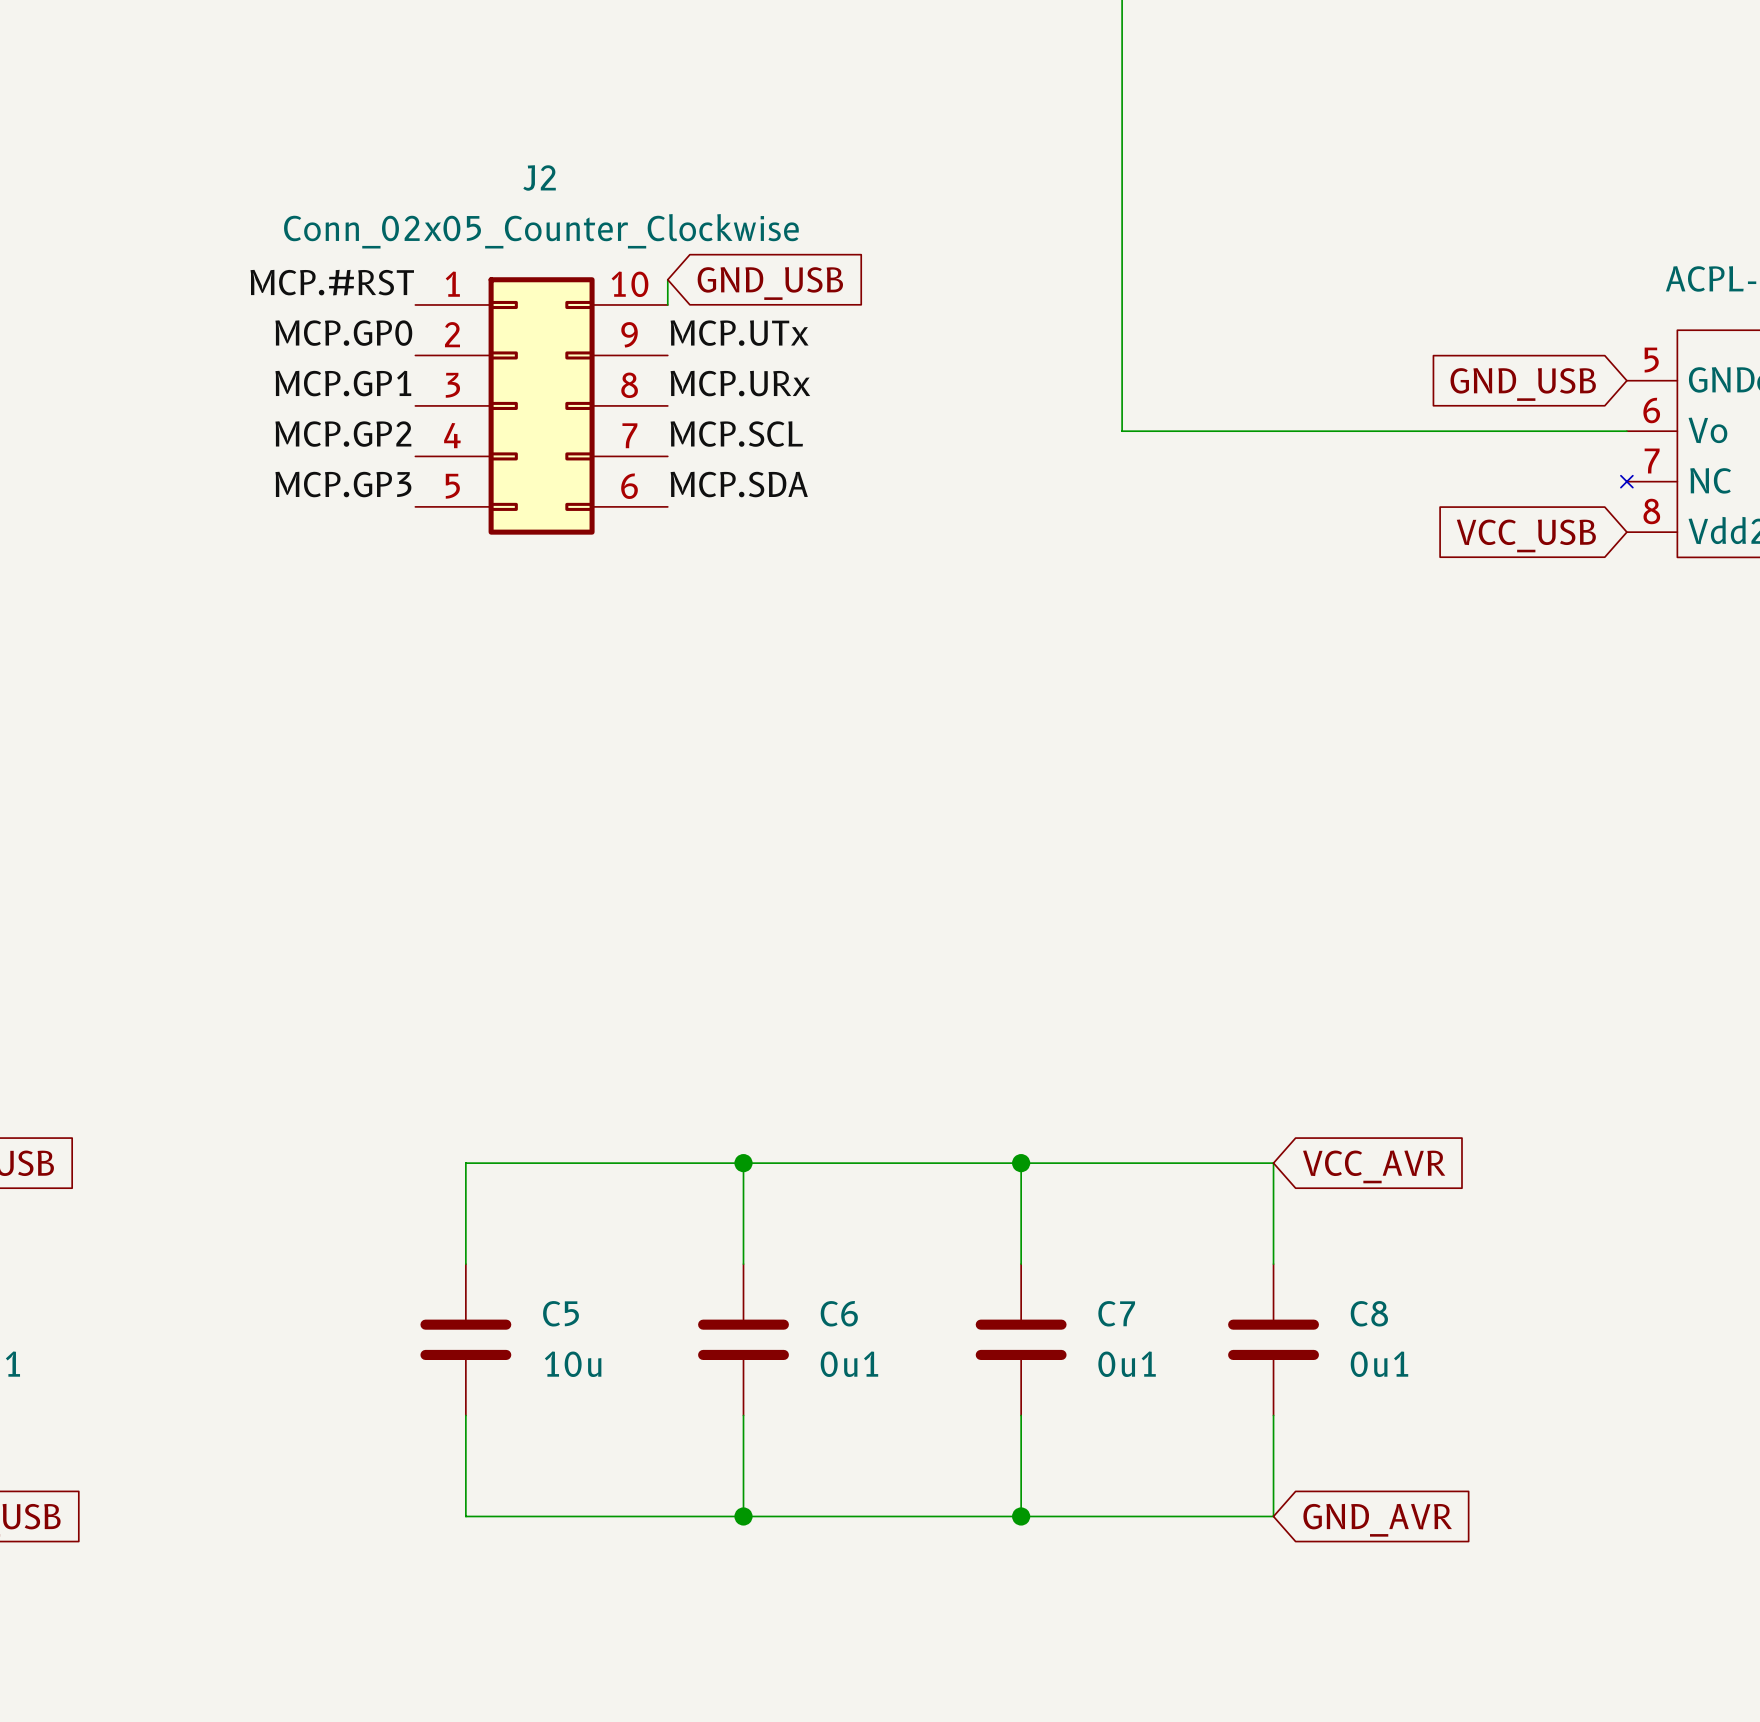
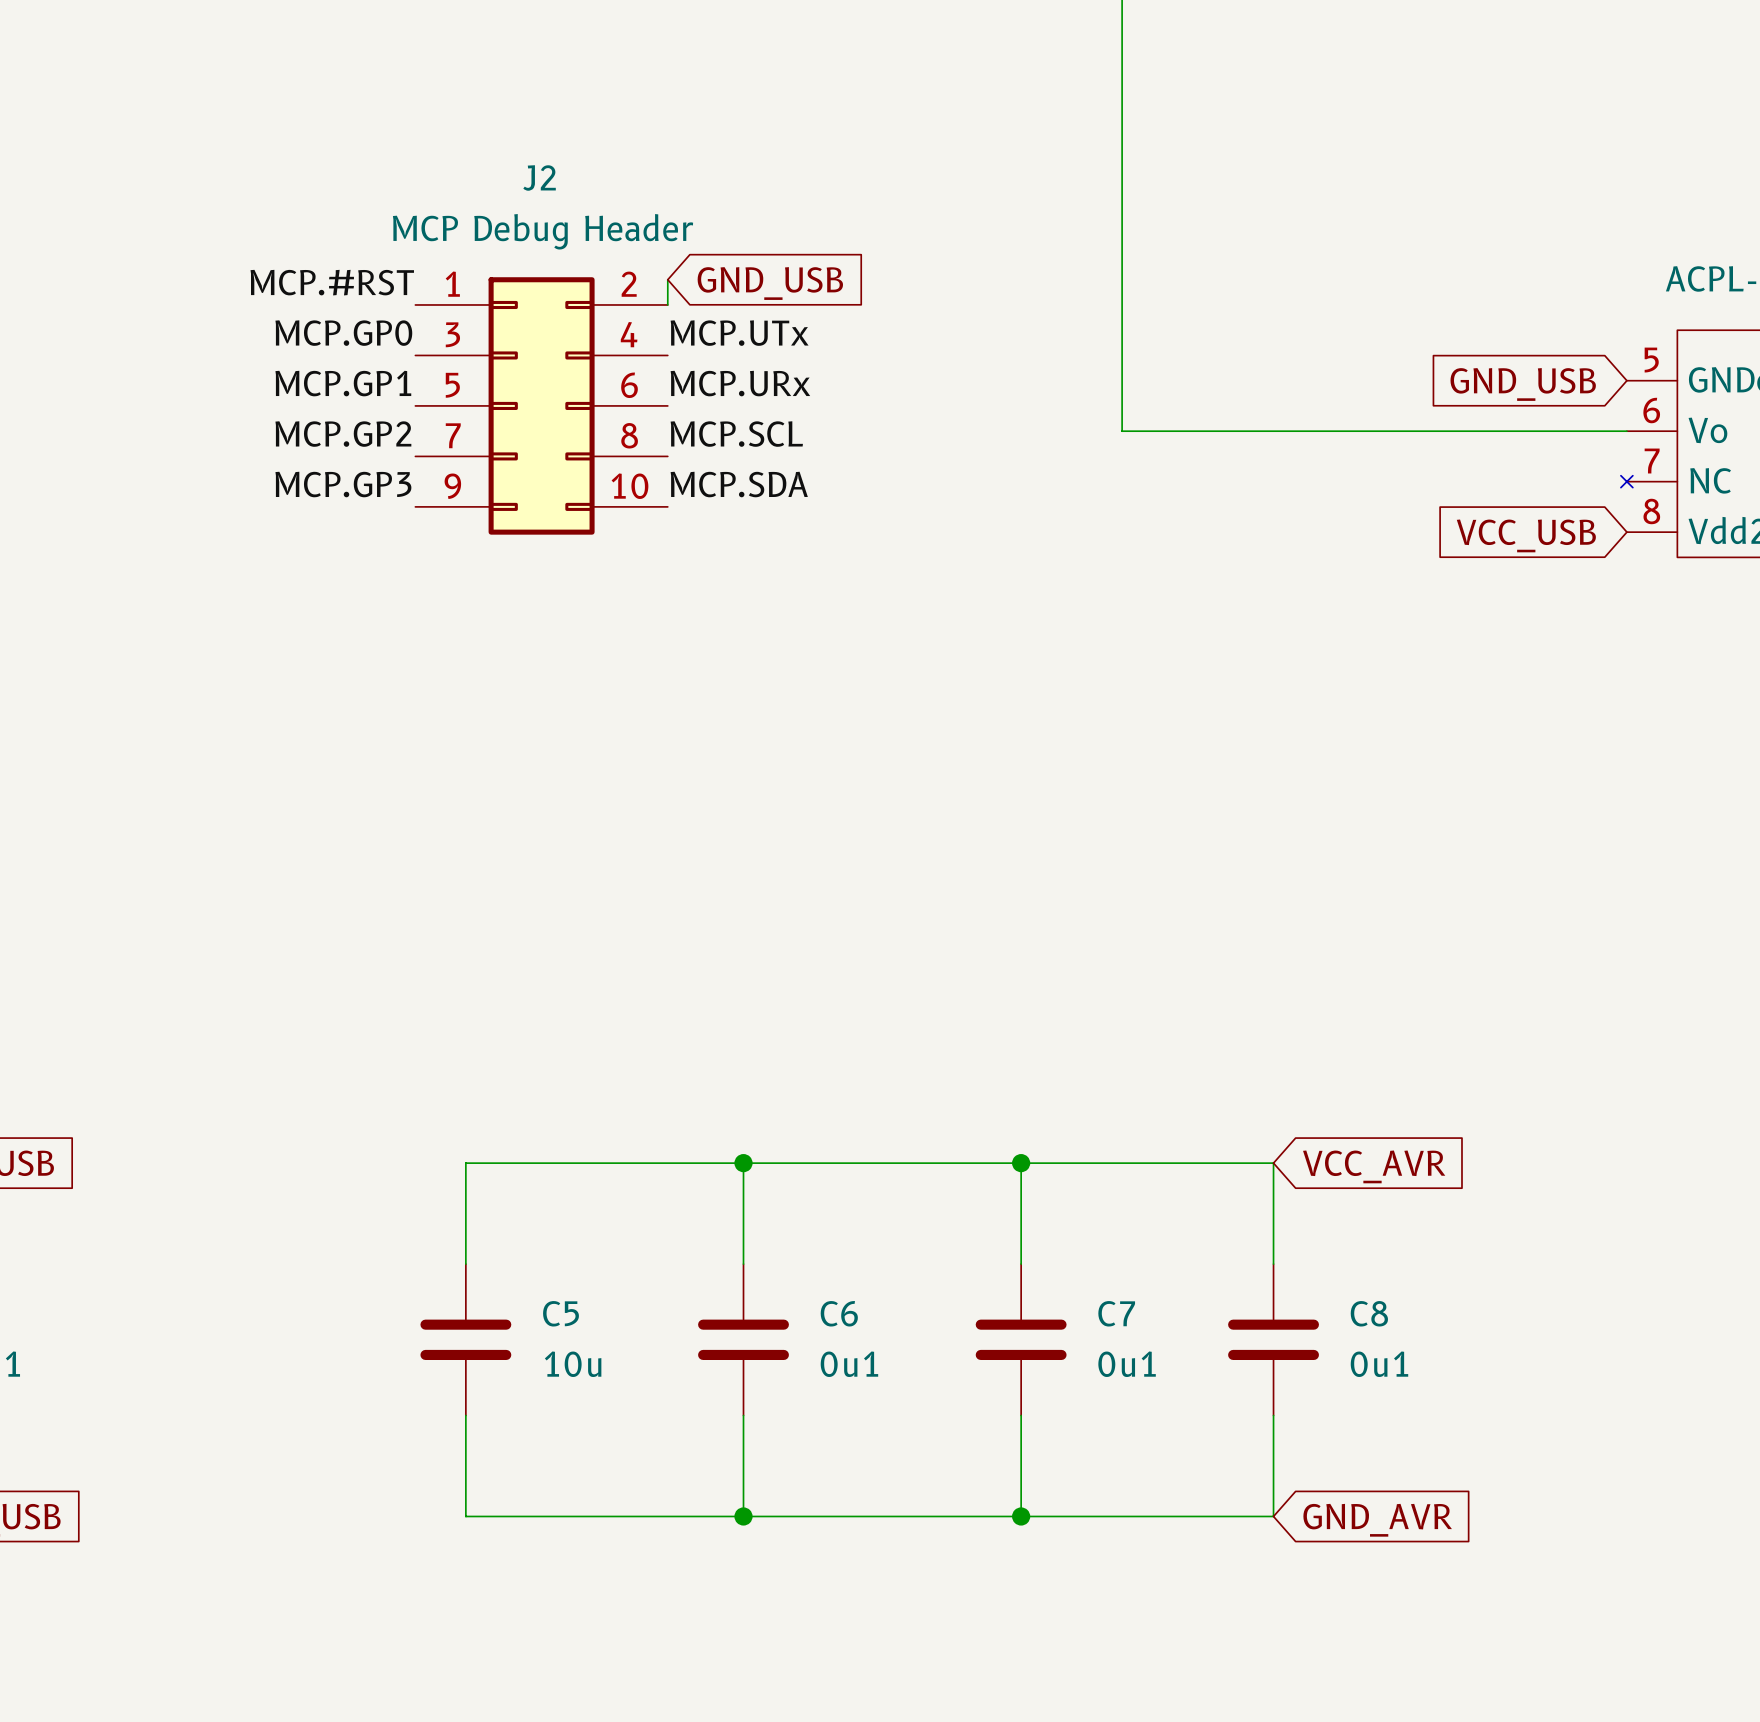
J2 value: Conn_02x05_Counter_Clockwise (541, 231) -> MCP Debug Header (543, 231)
J2 symbol: [415, 277, 668, 535] -> [415, 277, 668, 535]

